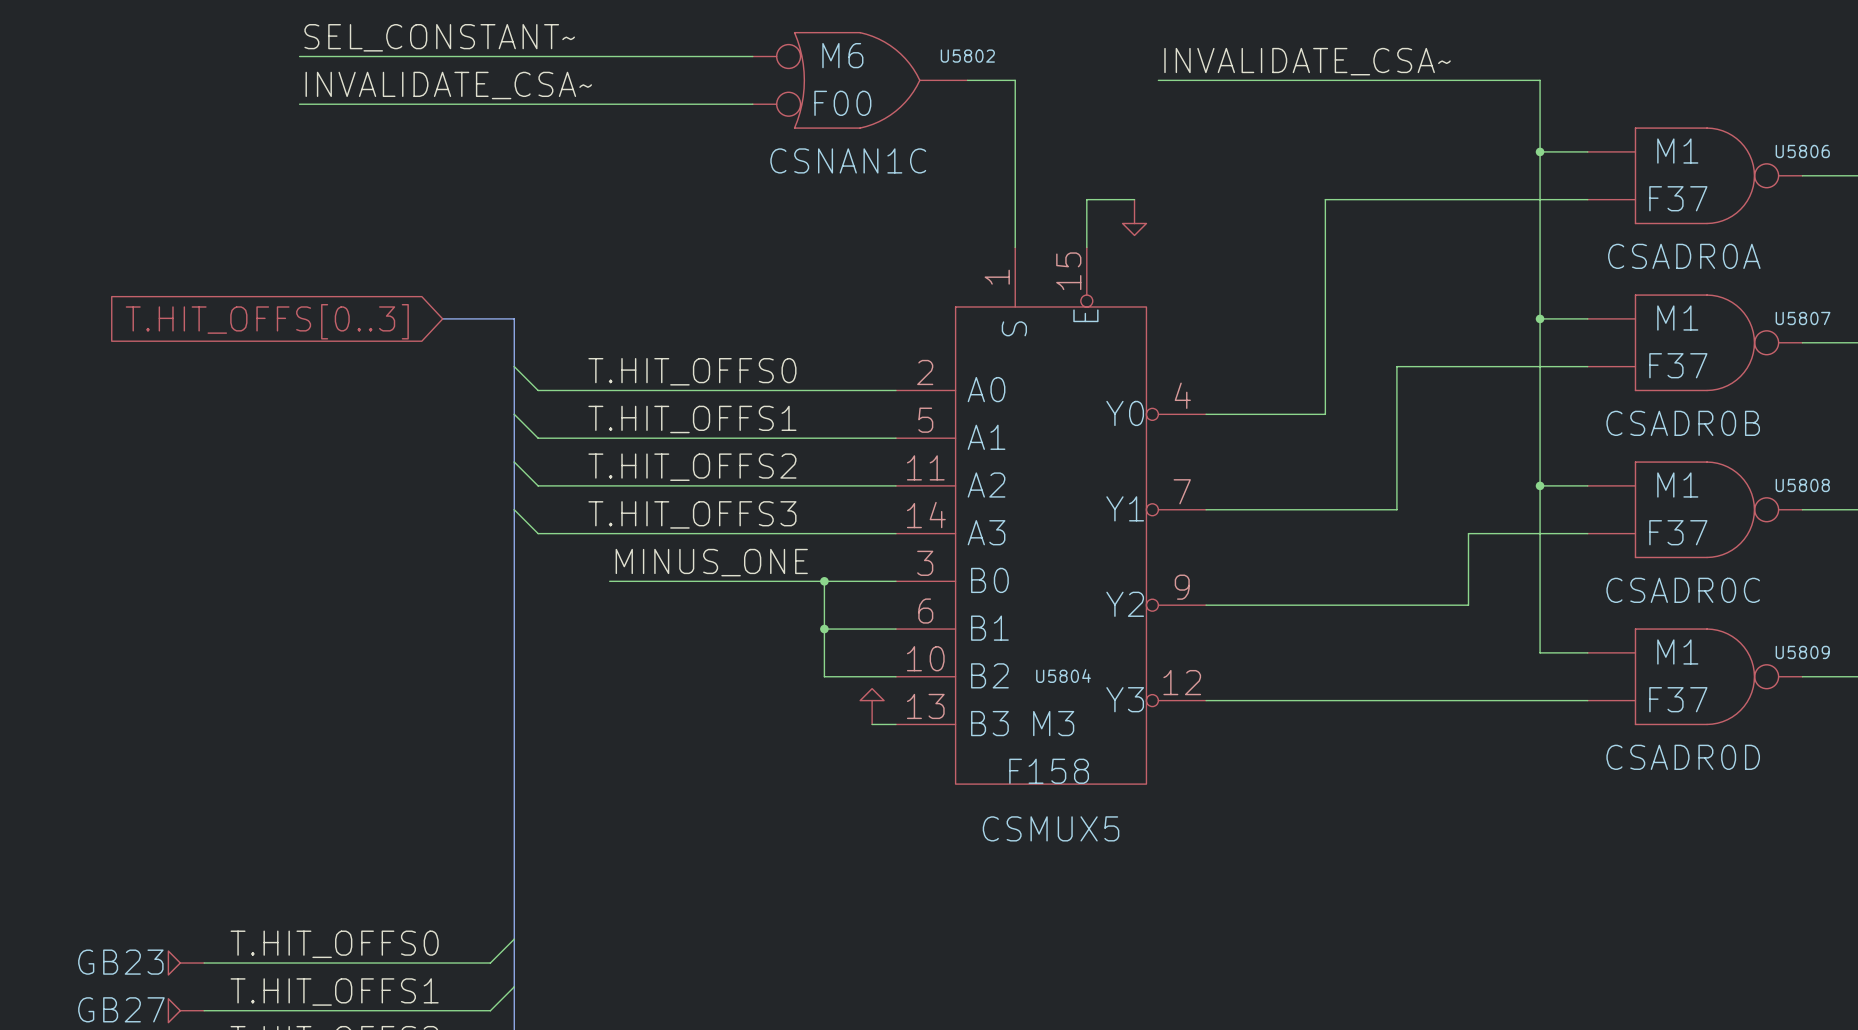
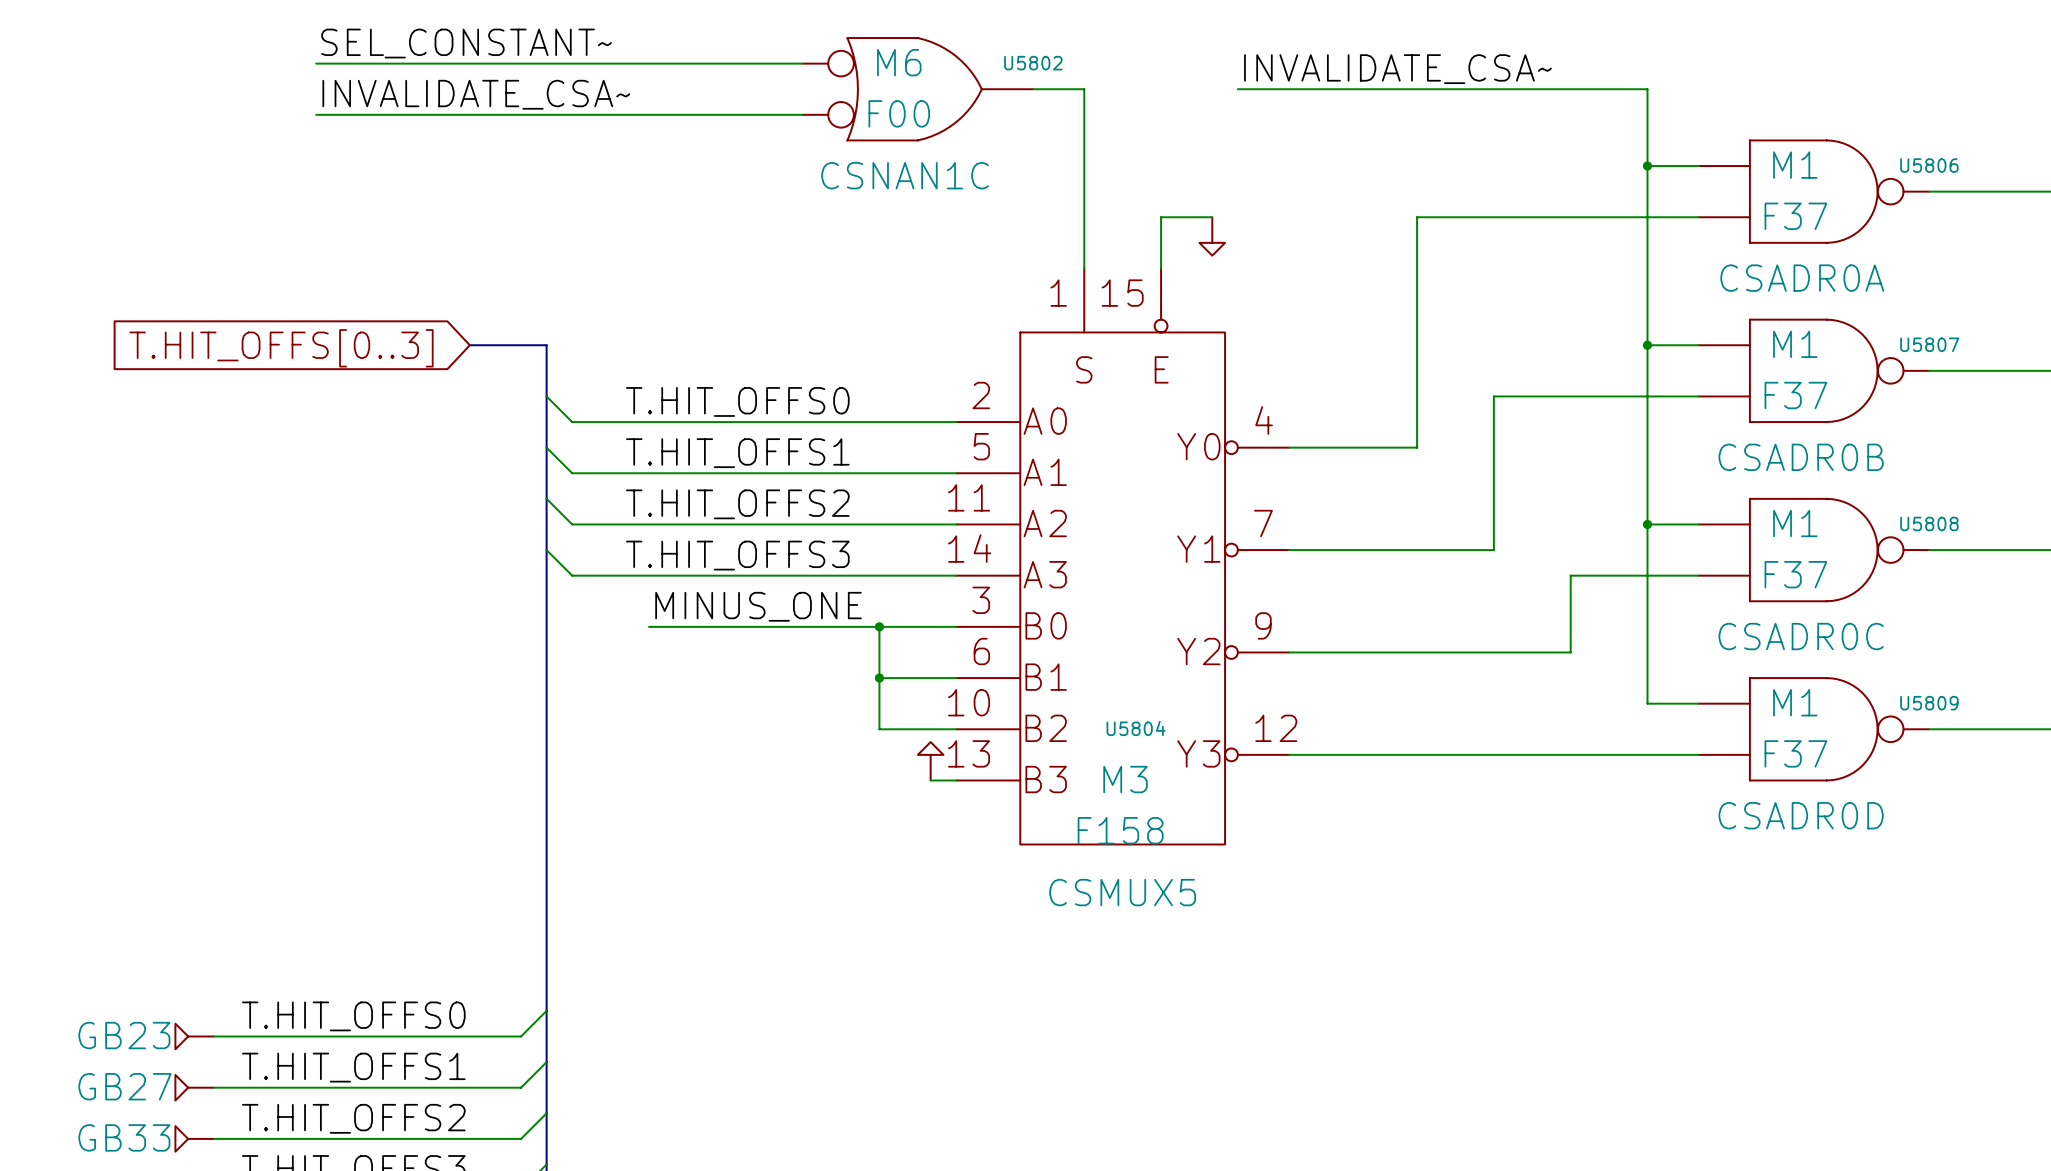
U5804 symbol: [895, 247, 1207, 785] -> [956, 268, 1290, 845]

